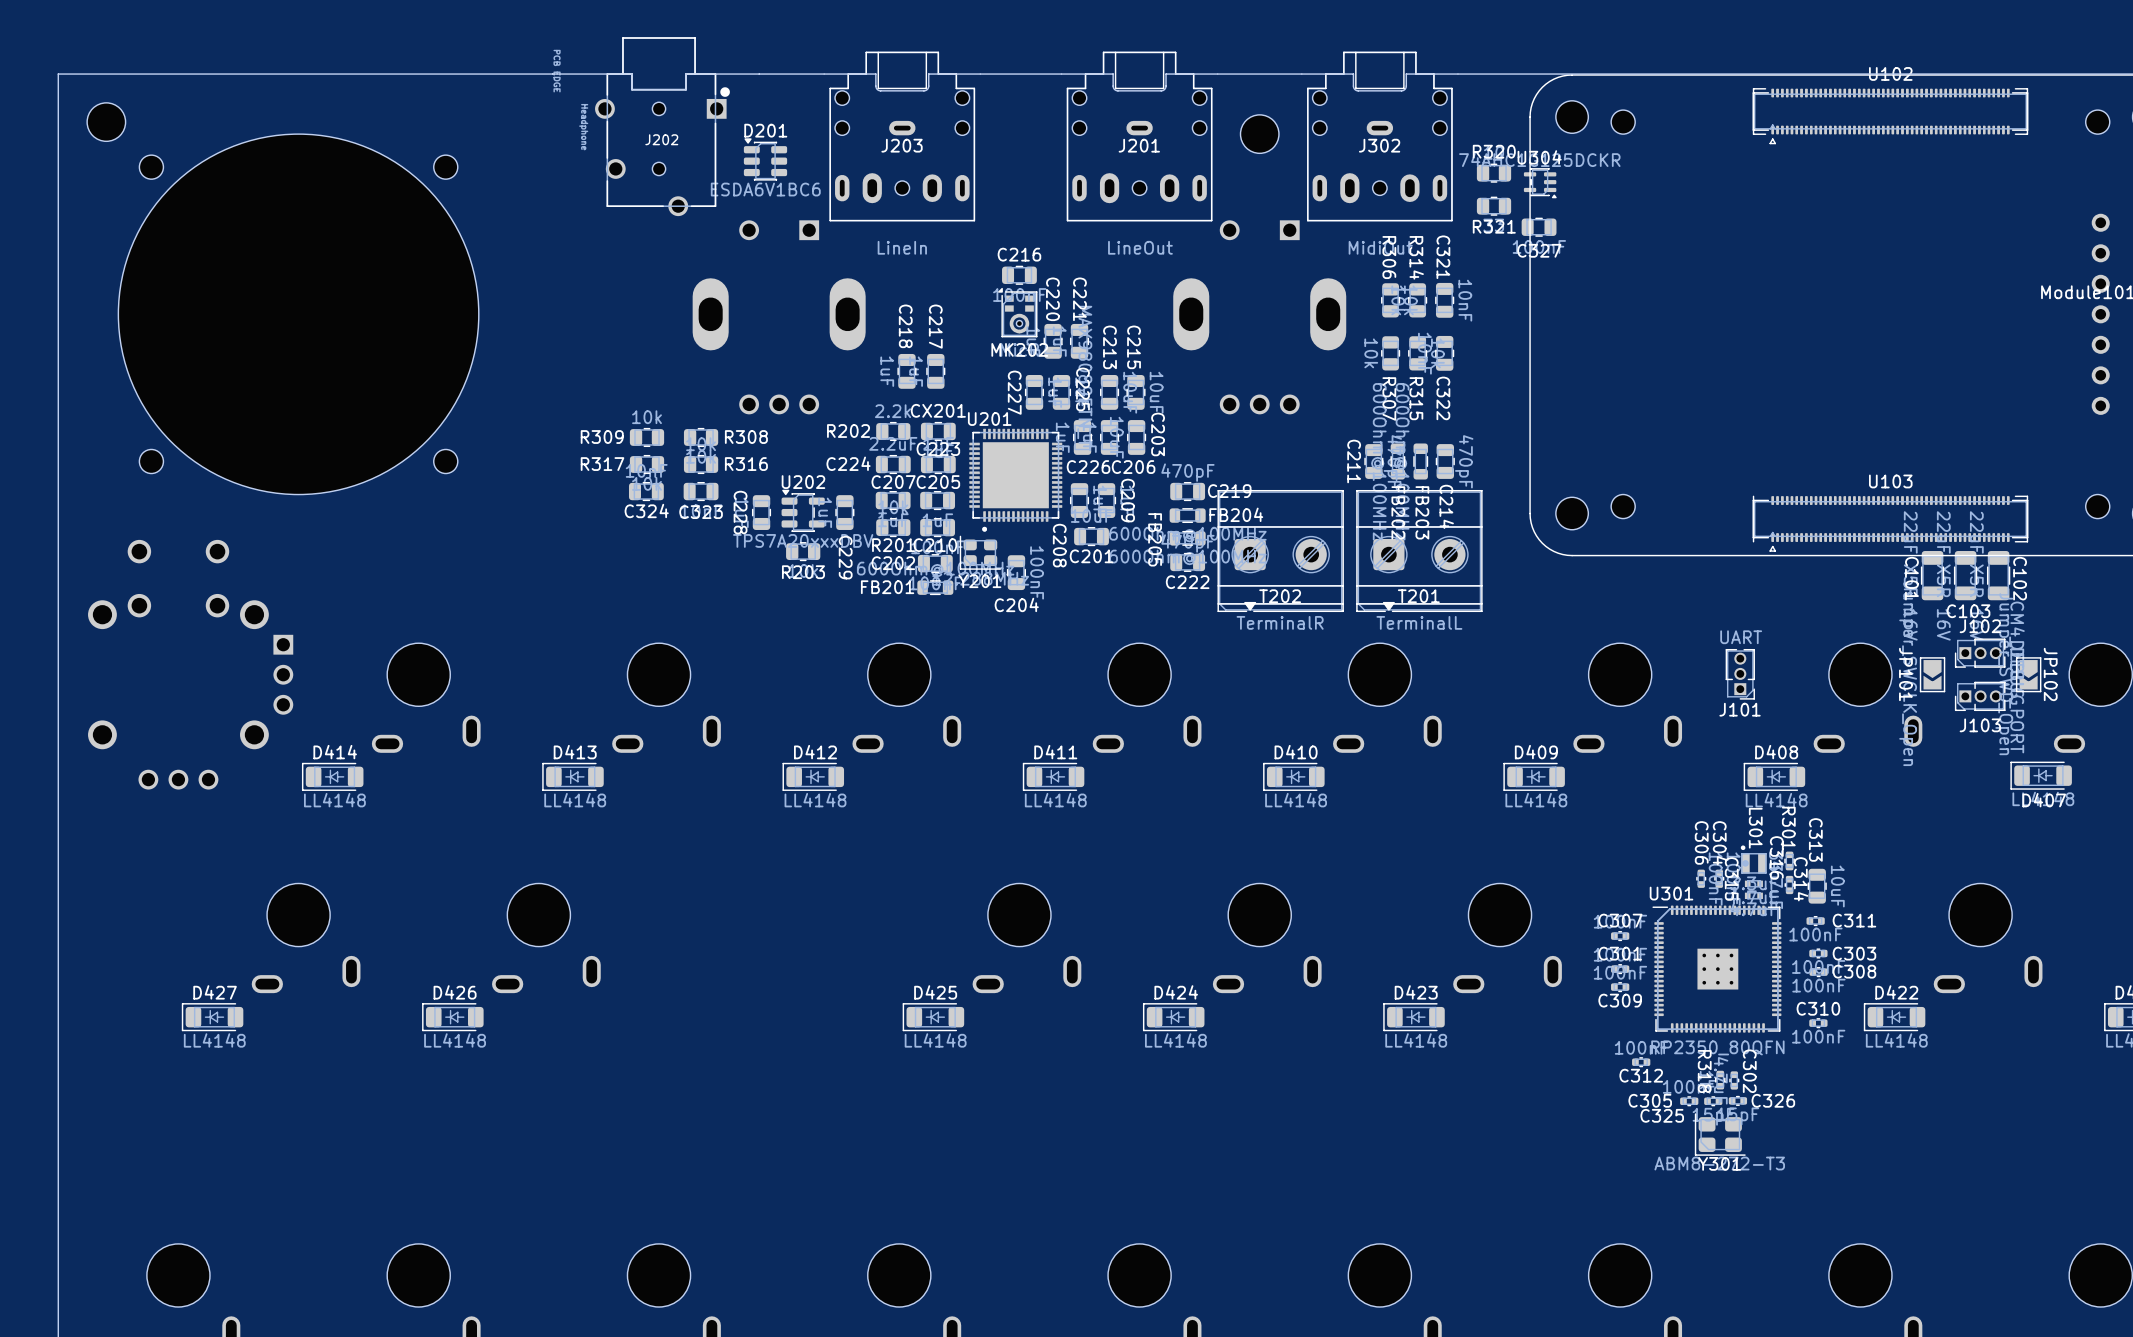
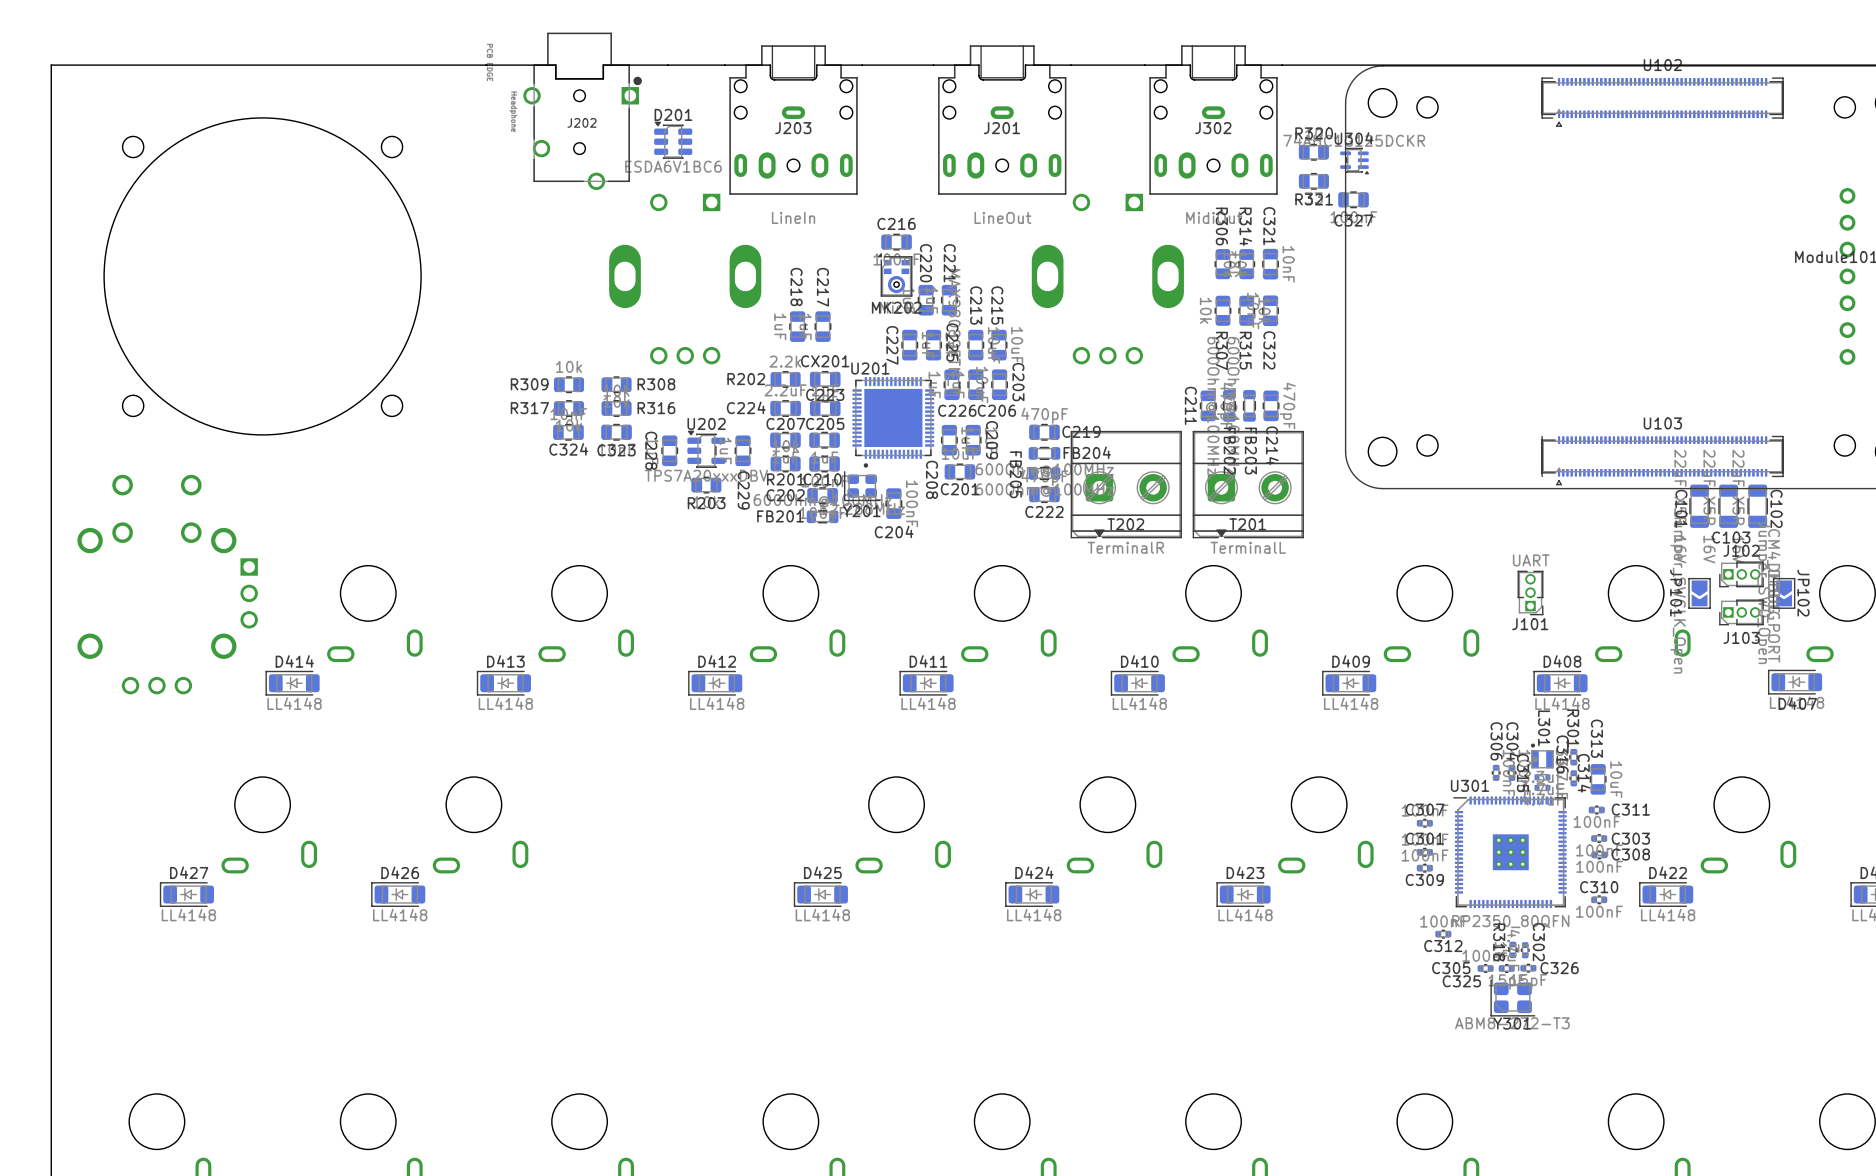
part: (106, 122) -> none
part: (1259, 134) -> none

